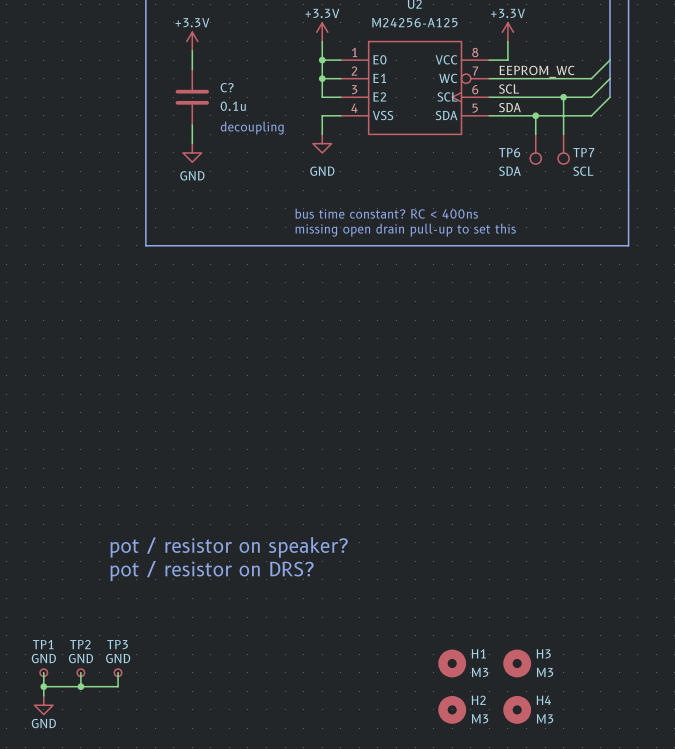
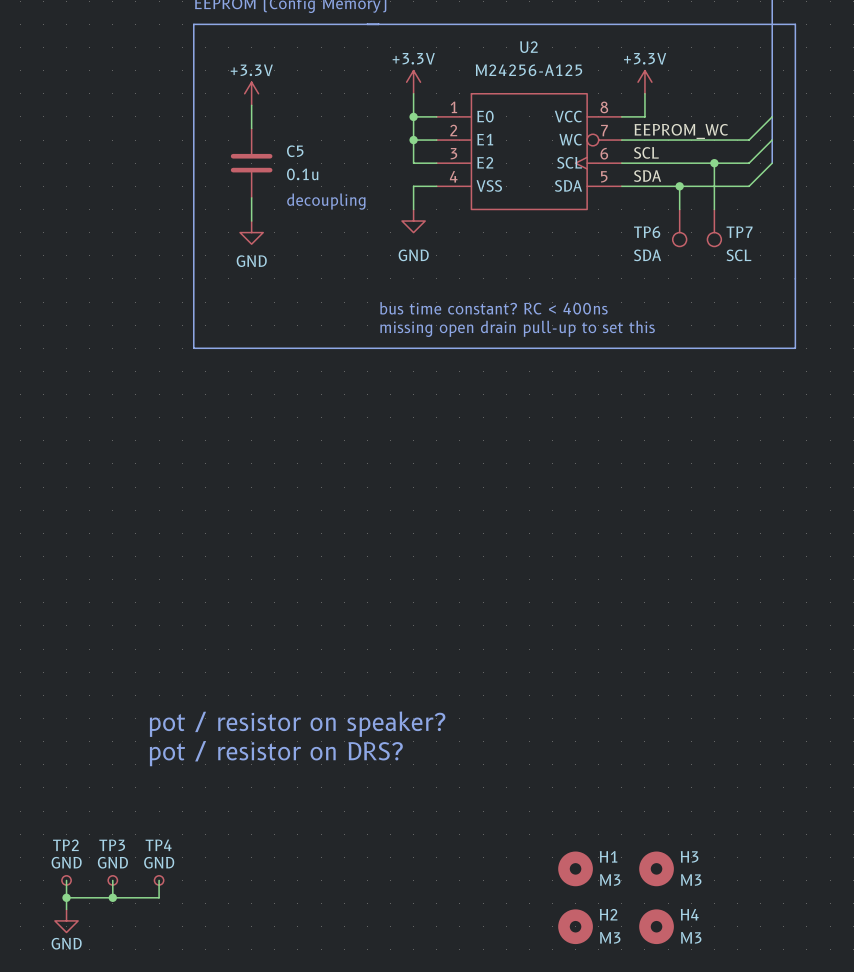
C? name: C? (227, 87) -> C5 (295, 151)
TP1 name: TP1 (43, 644) -> TP2 (65, 845)
TP2 name: TP2 (80, 644) -> TP3 (112, 845)
TP3 name: TP3 (117, 644) -> TP4 (158, 845)

